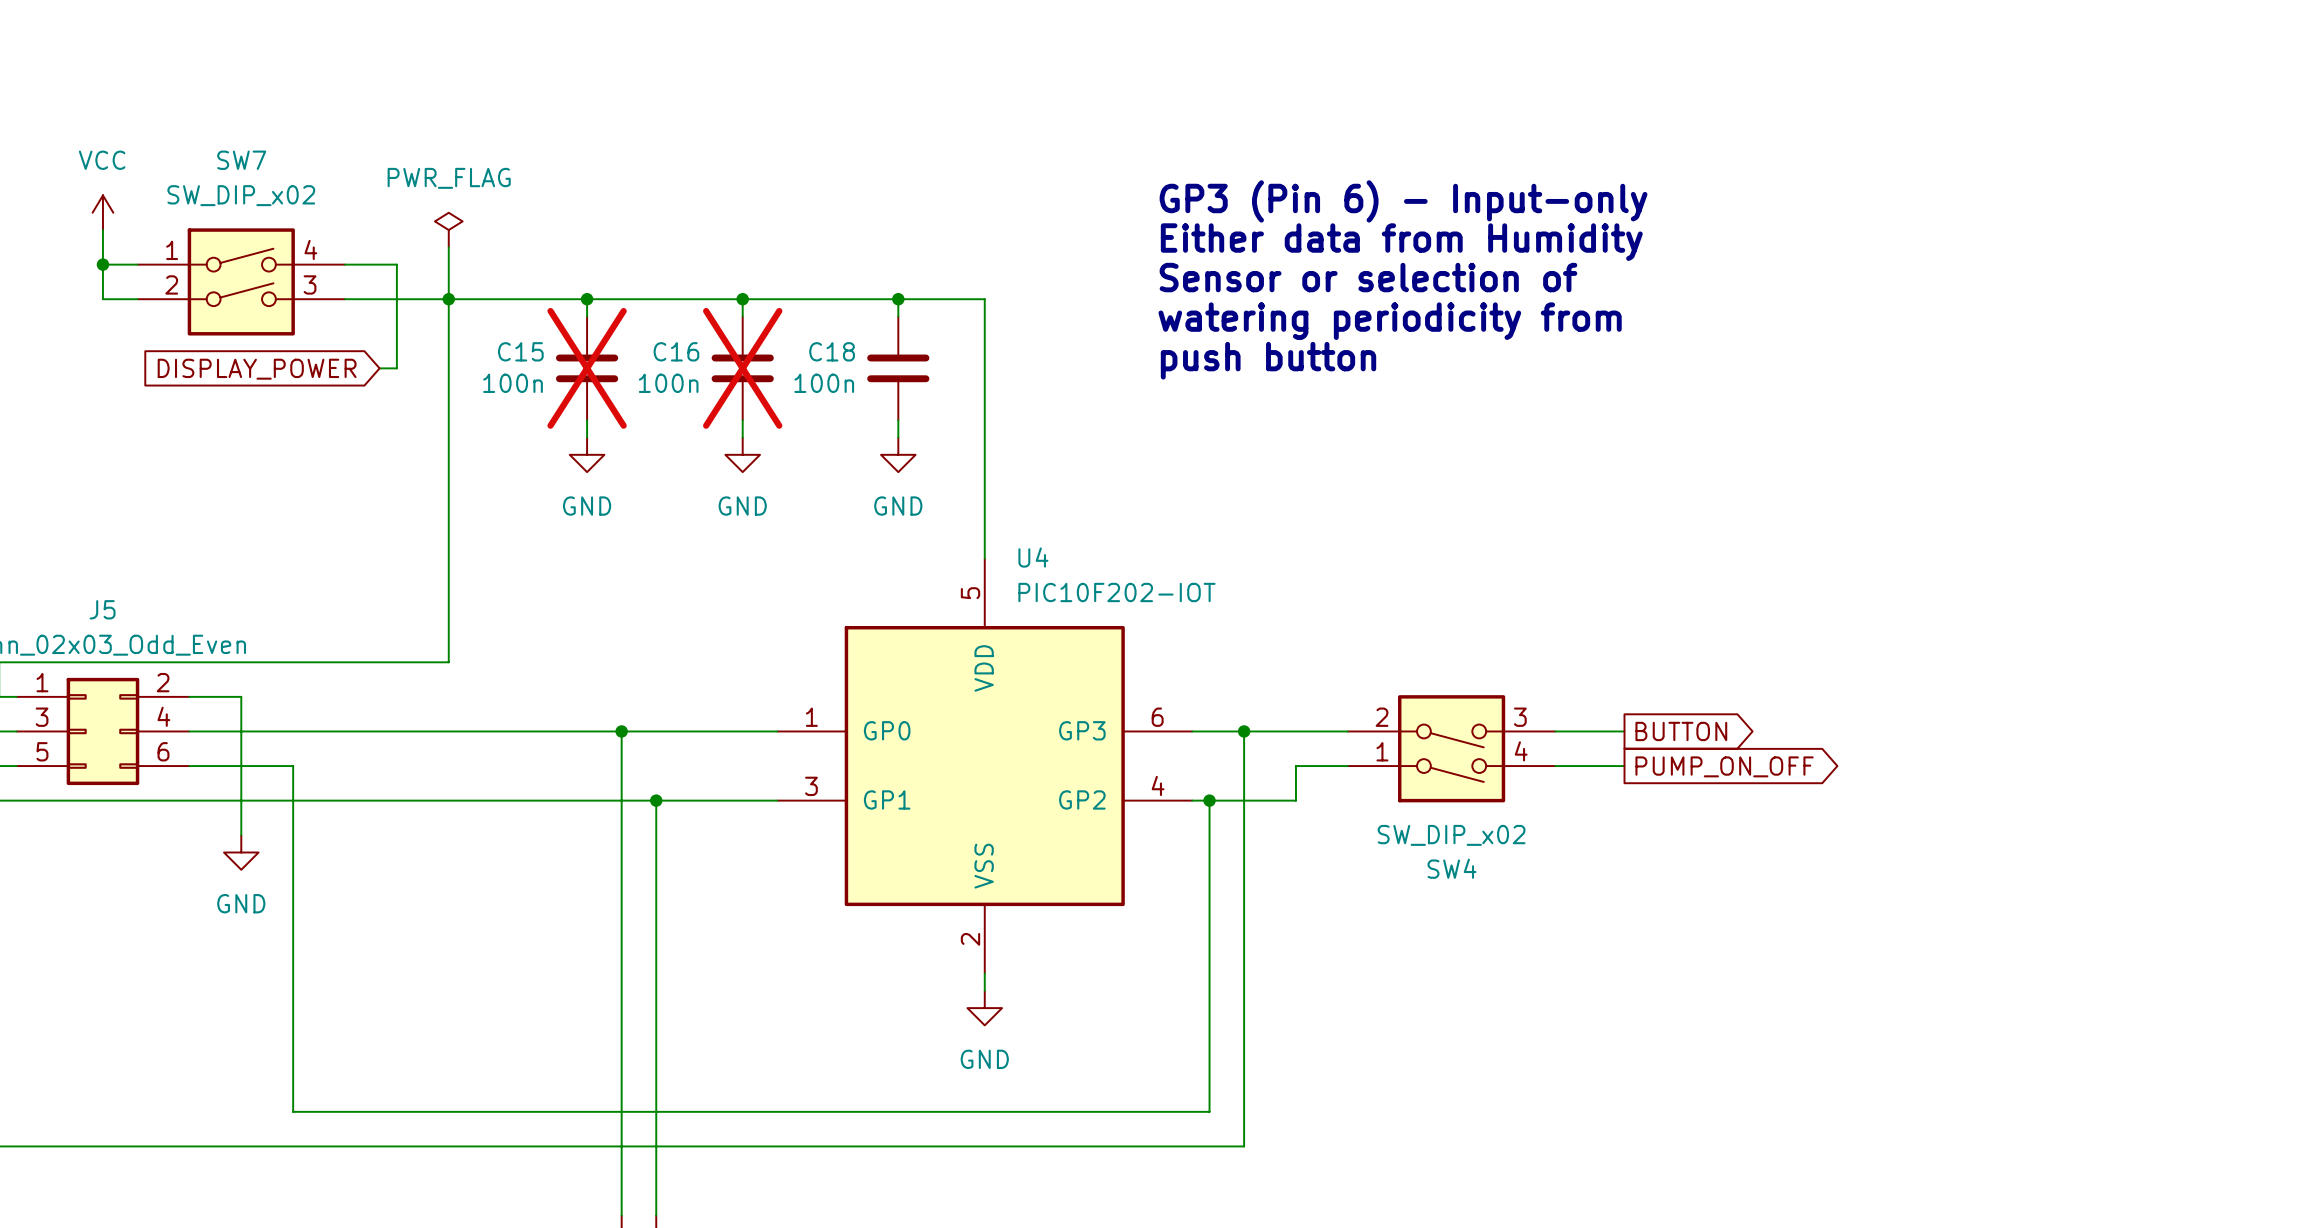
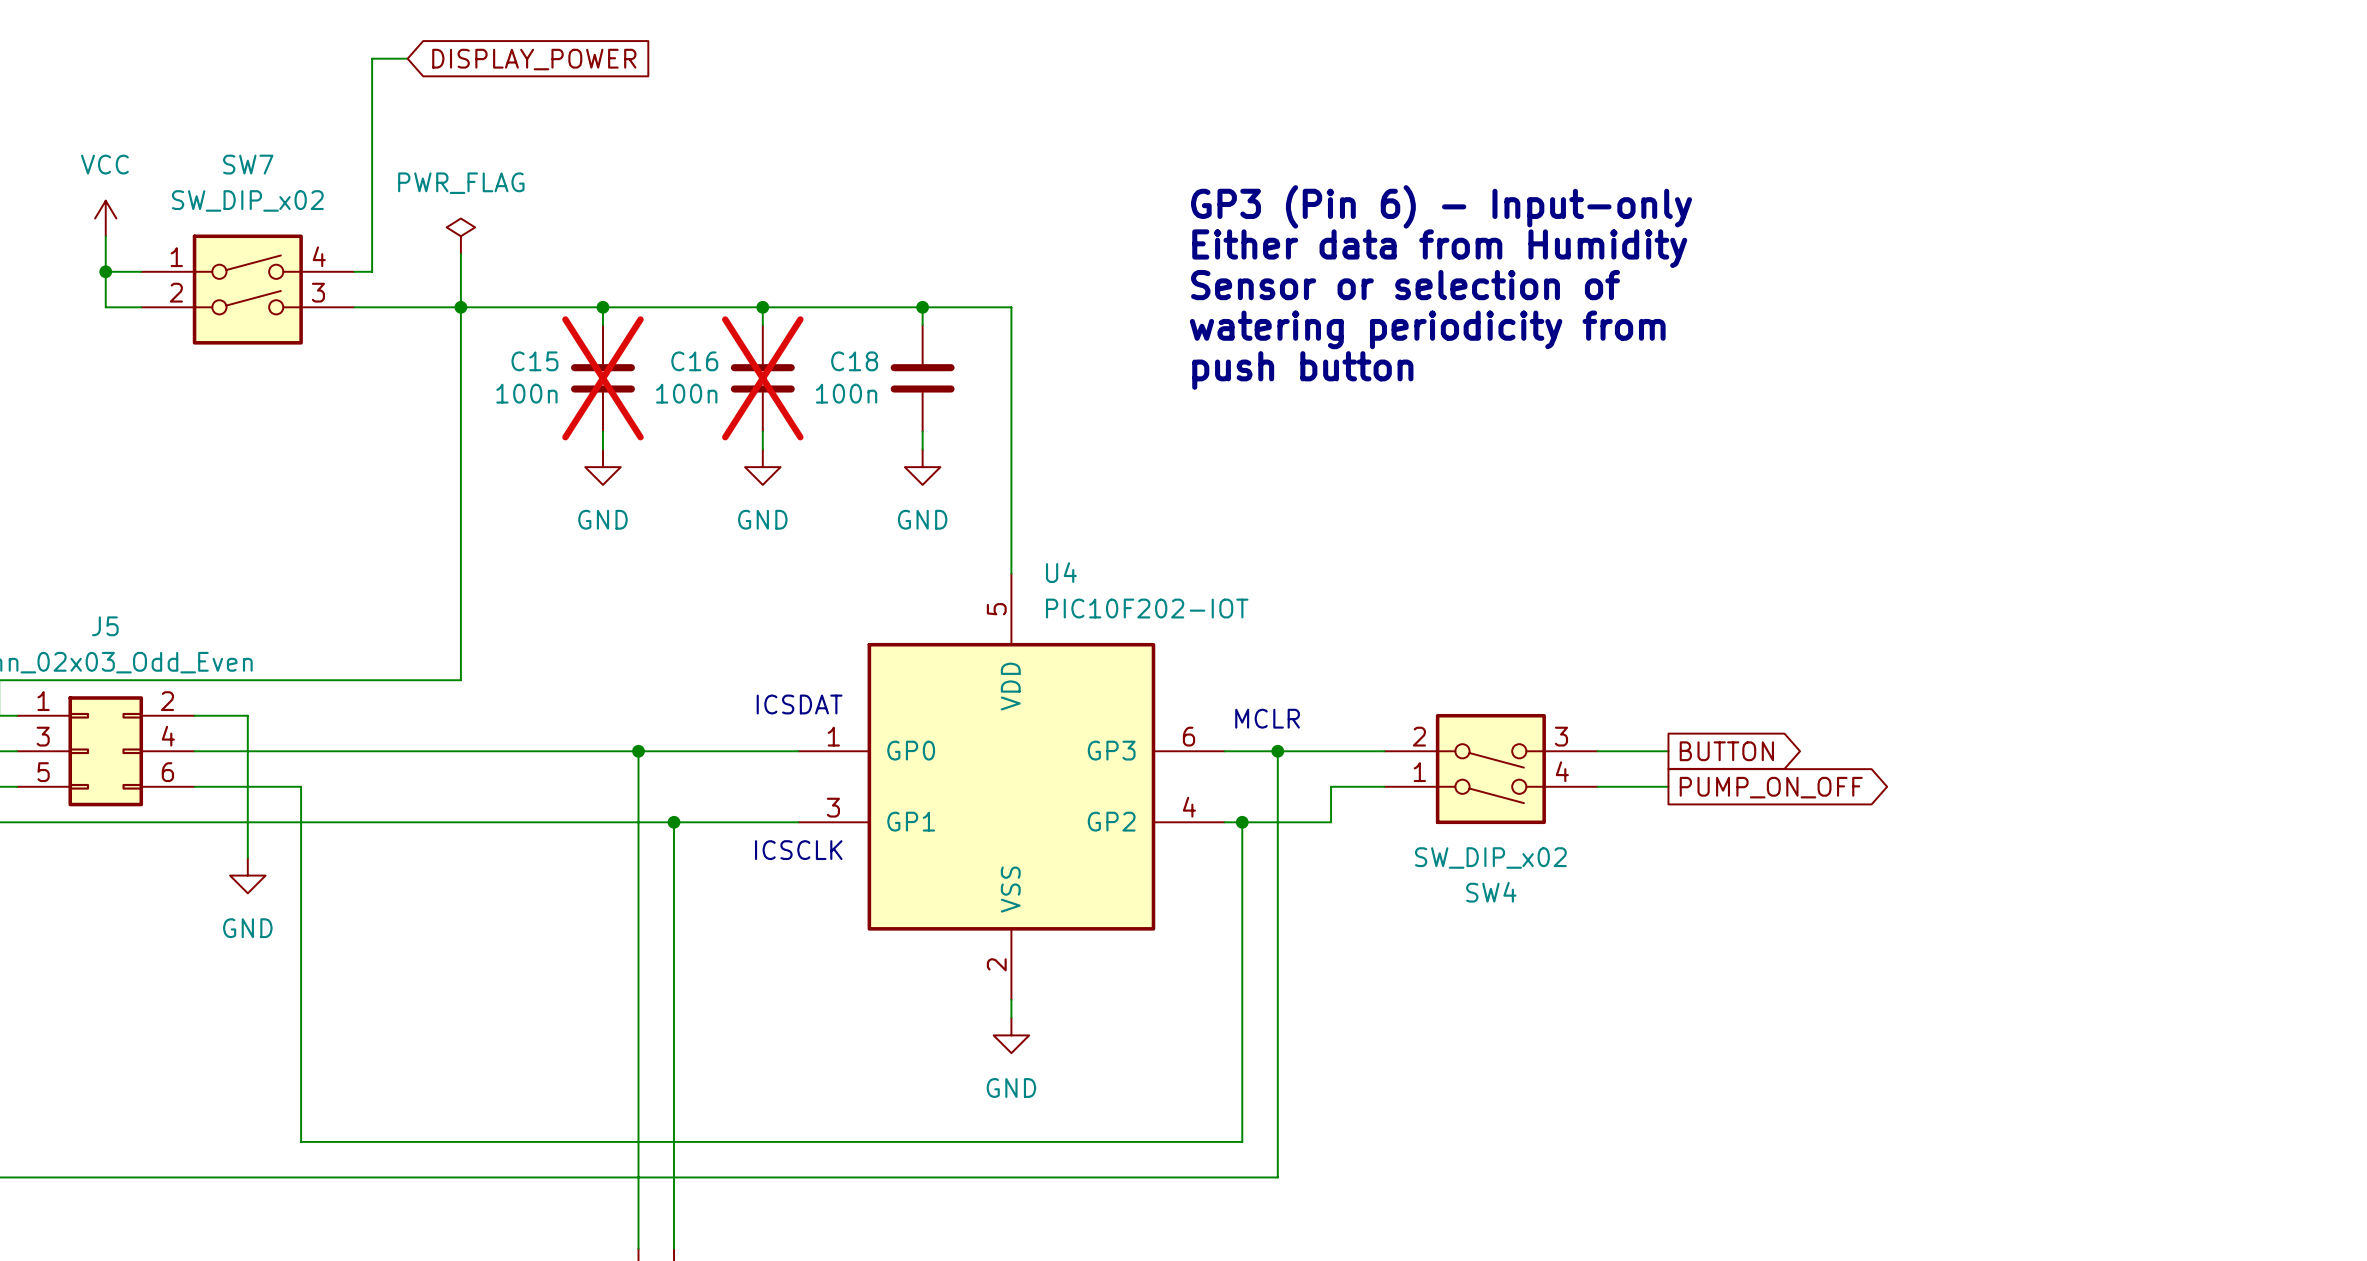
wire: (362, 264) (396, 264) (396, 368) (379, 368) -> (372, 271) (372, 58) (407, 58)
global label rotation: 0° (257, 369) -> 180° (534, 59)
global label position: DISPLAY_POWER (257, 369) -> DISPLAY_POWER (534, 59)
text: none -> ICSDAT (799, 704)
text: none -> MCLR (1267, 718)
text: none -> ICSCLK (798, 850)

